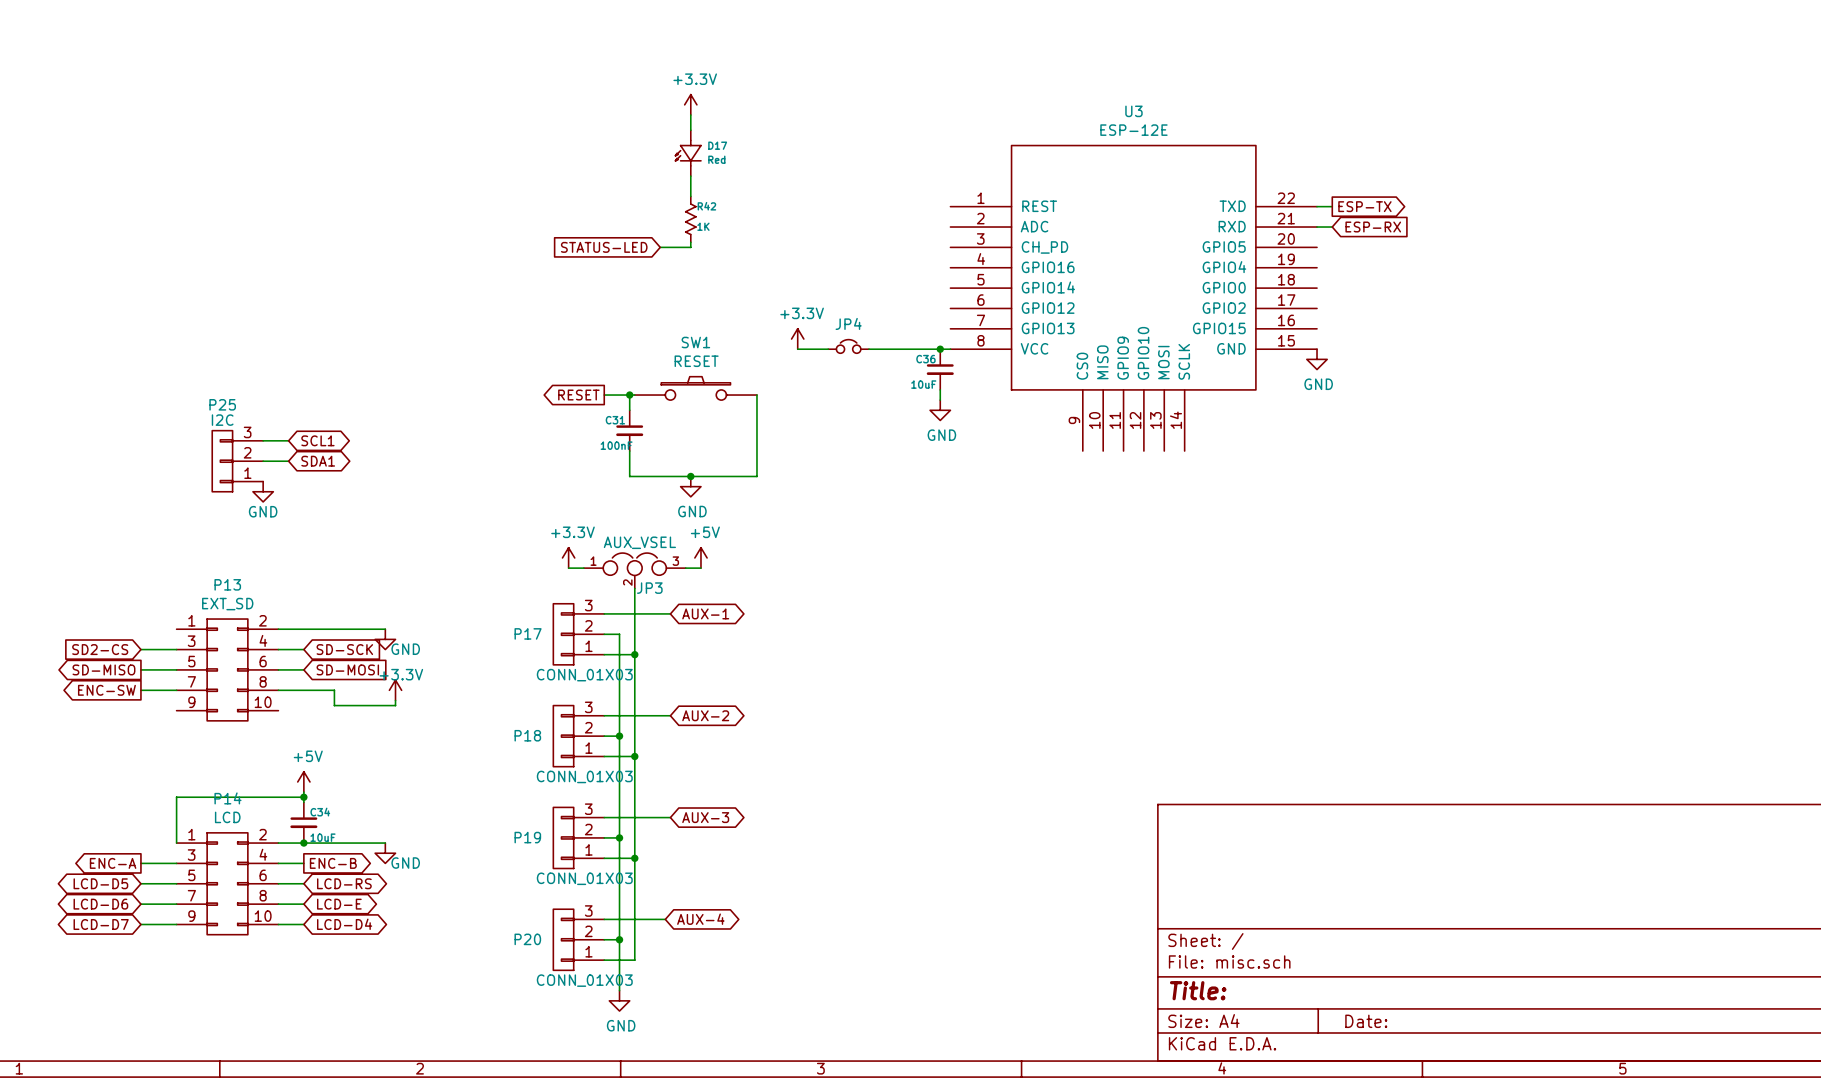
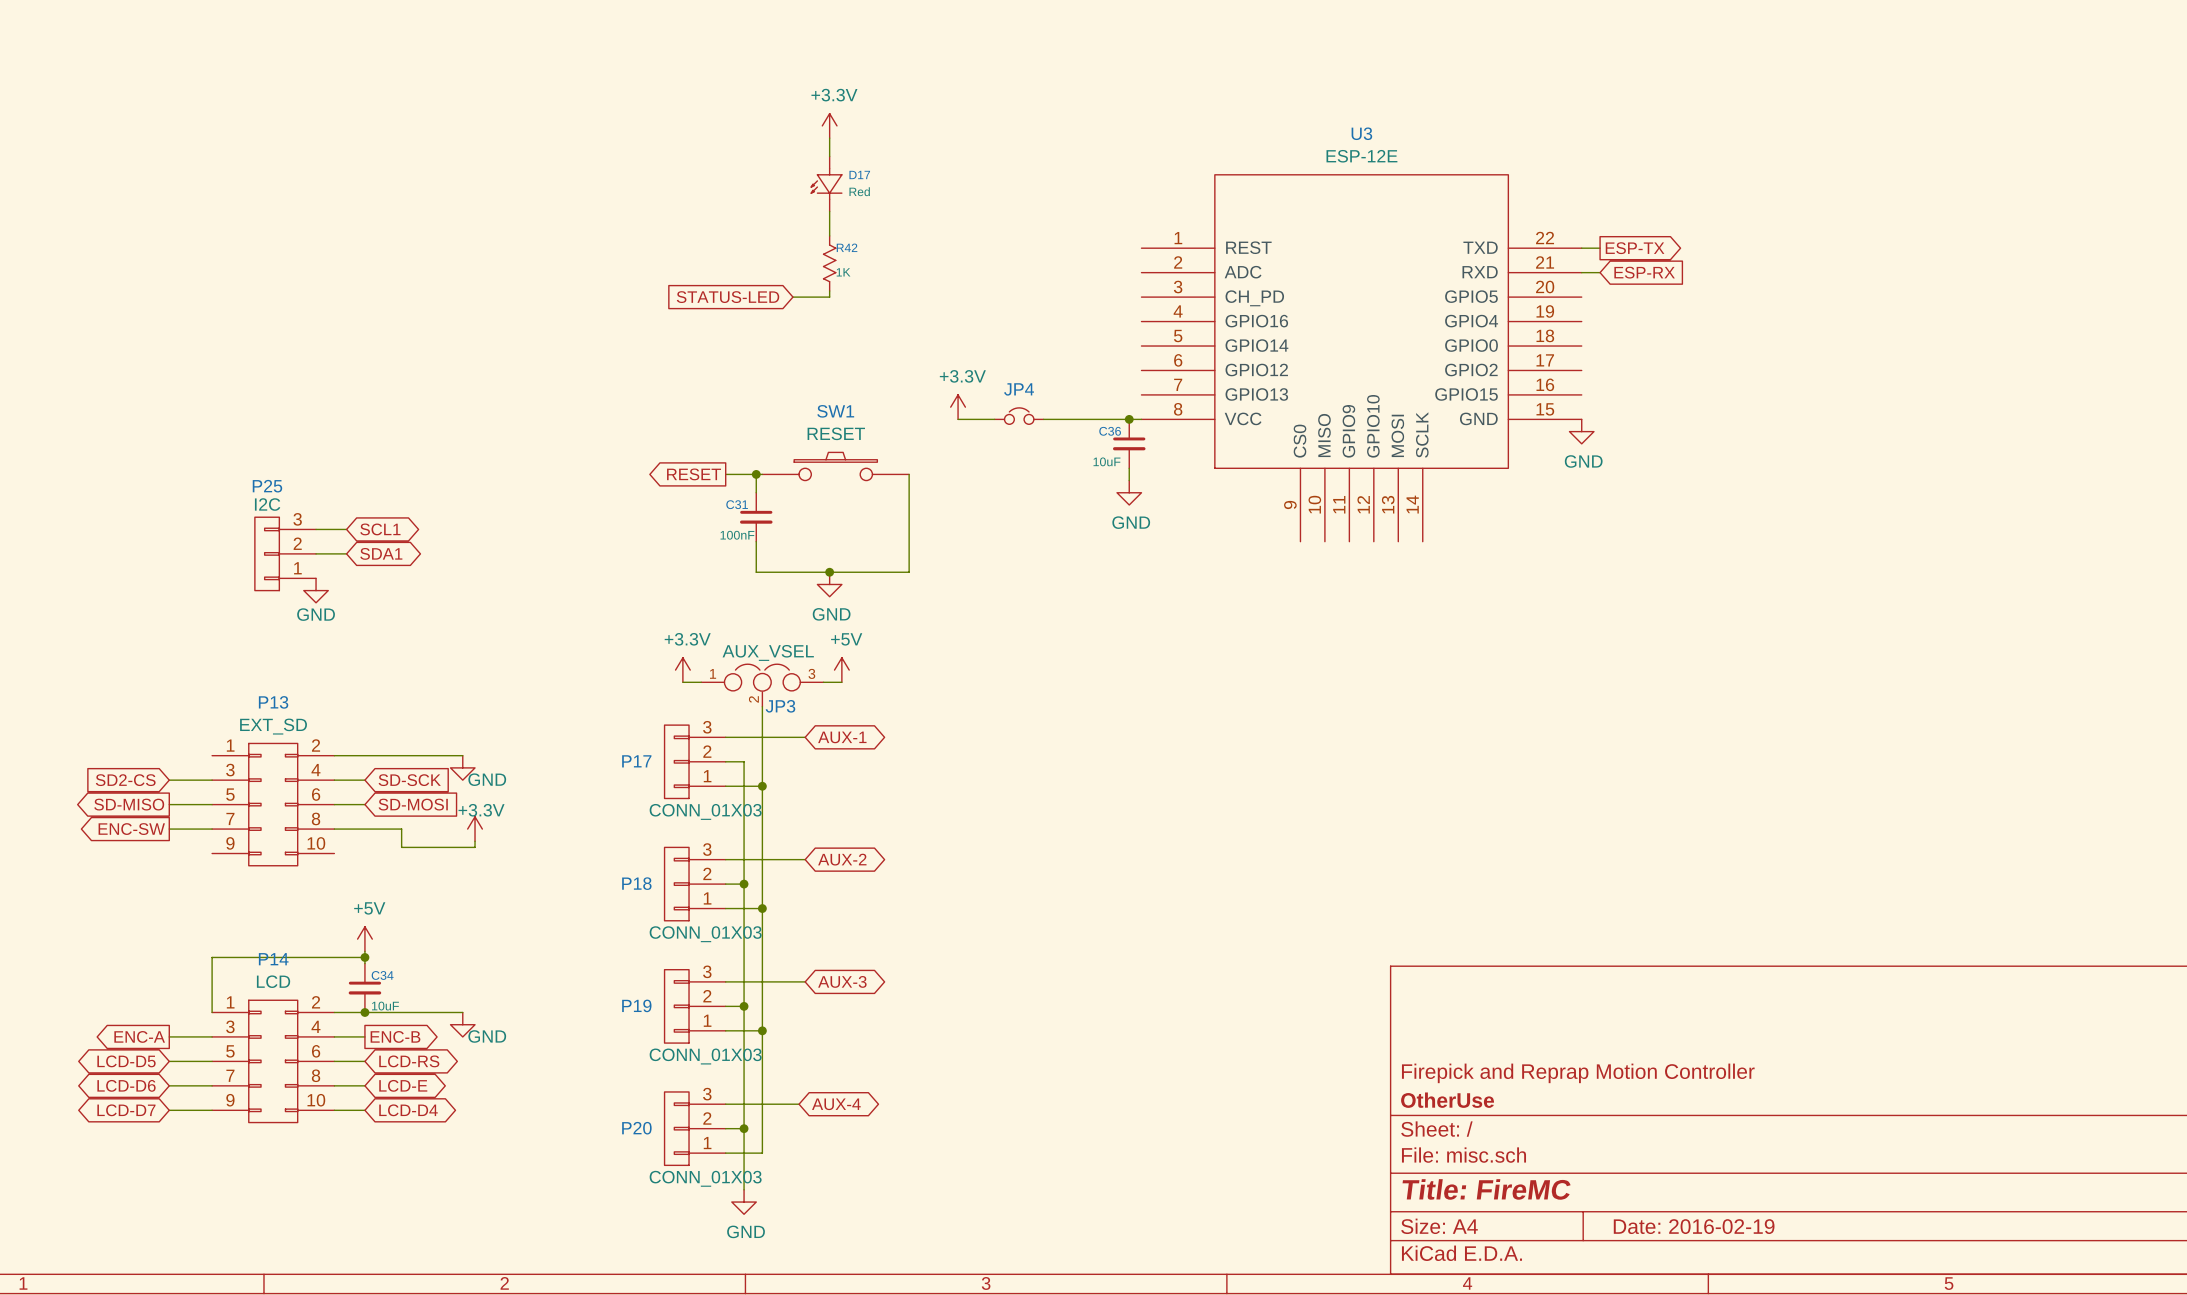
title block: none -> Firepick and Reprap Motion Controller (1578, 1073)
title block: none -> OtherUse (1447, 1100)
title block: Title: (1198, 990) -> Title: FireMC (1486, 1189)
title block: Date: (1366, 1021) -> Date: 2016-02-19 (1694, 1226)

